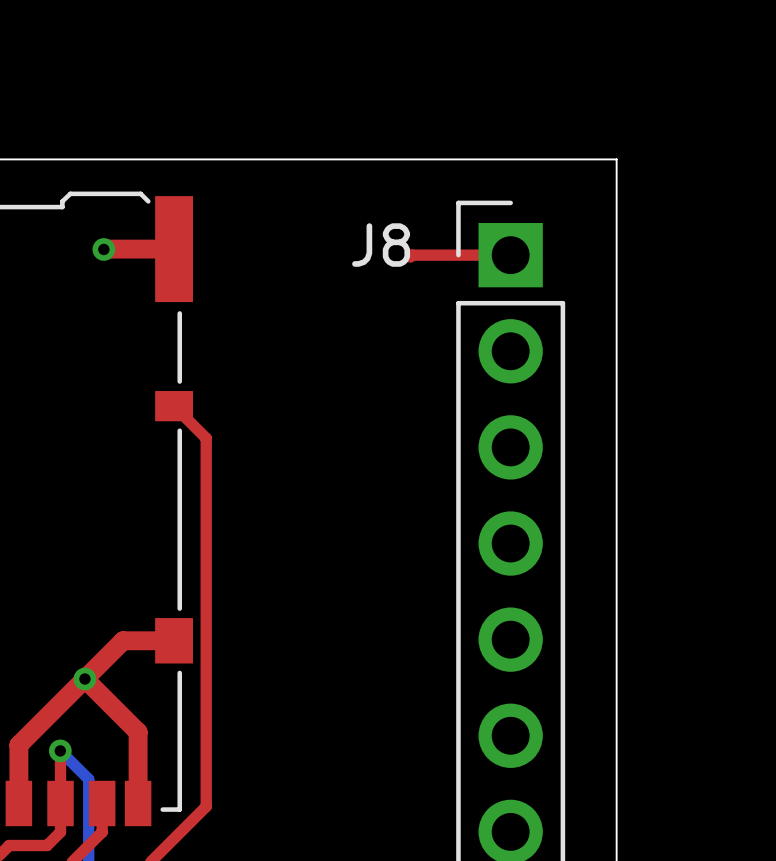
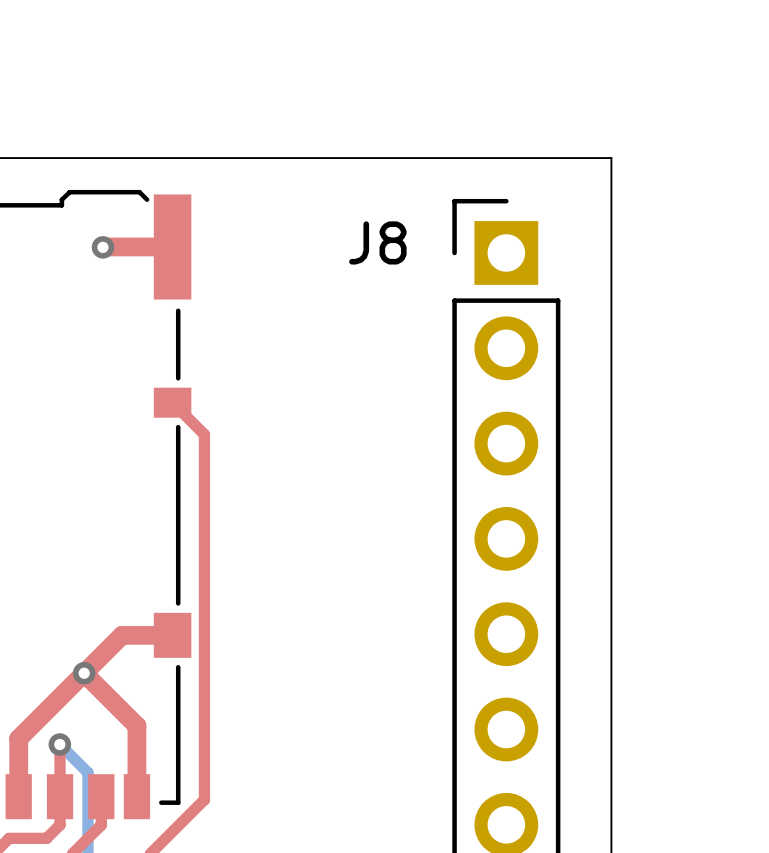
top track: (510, 255) (412, 255) (410, 257) -> none

